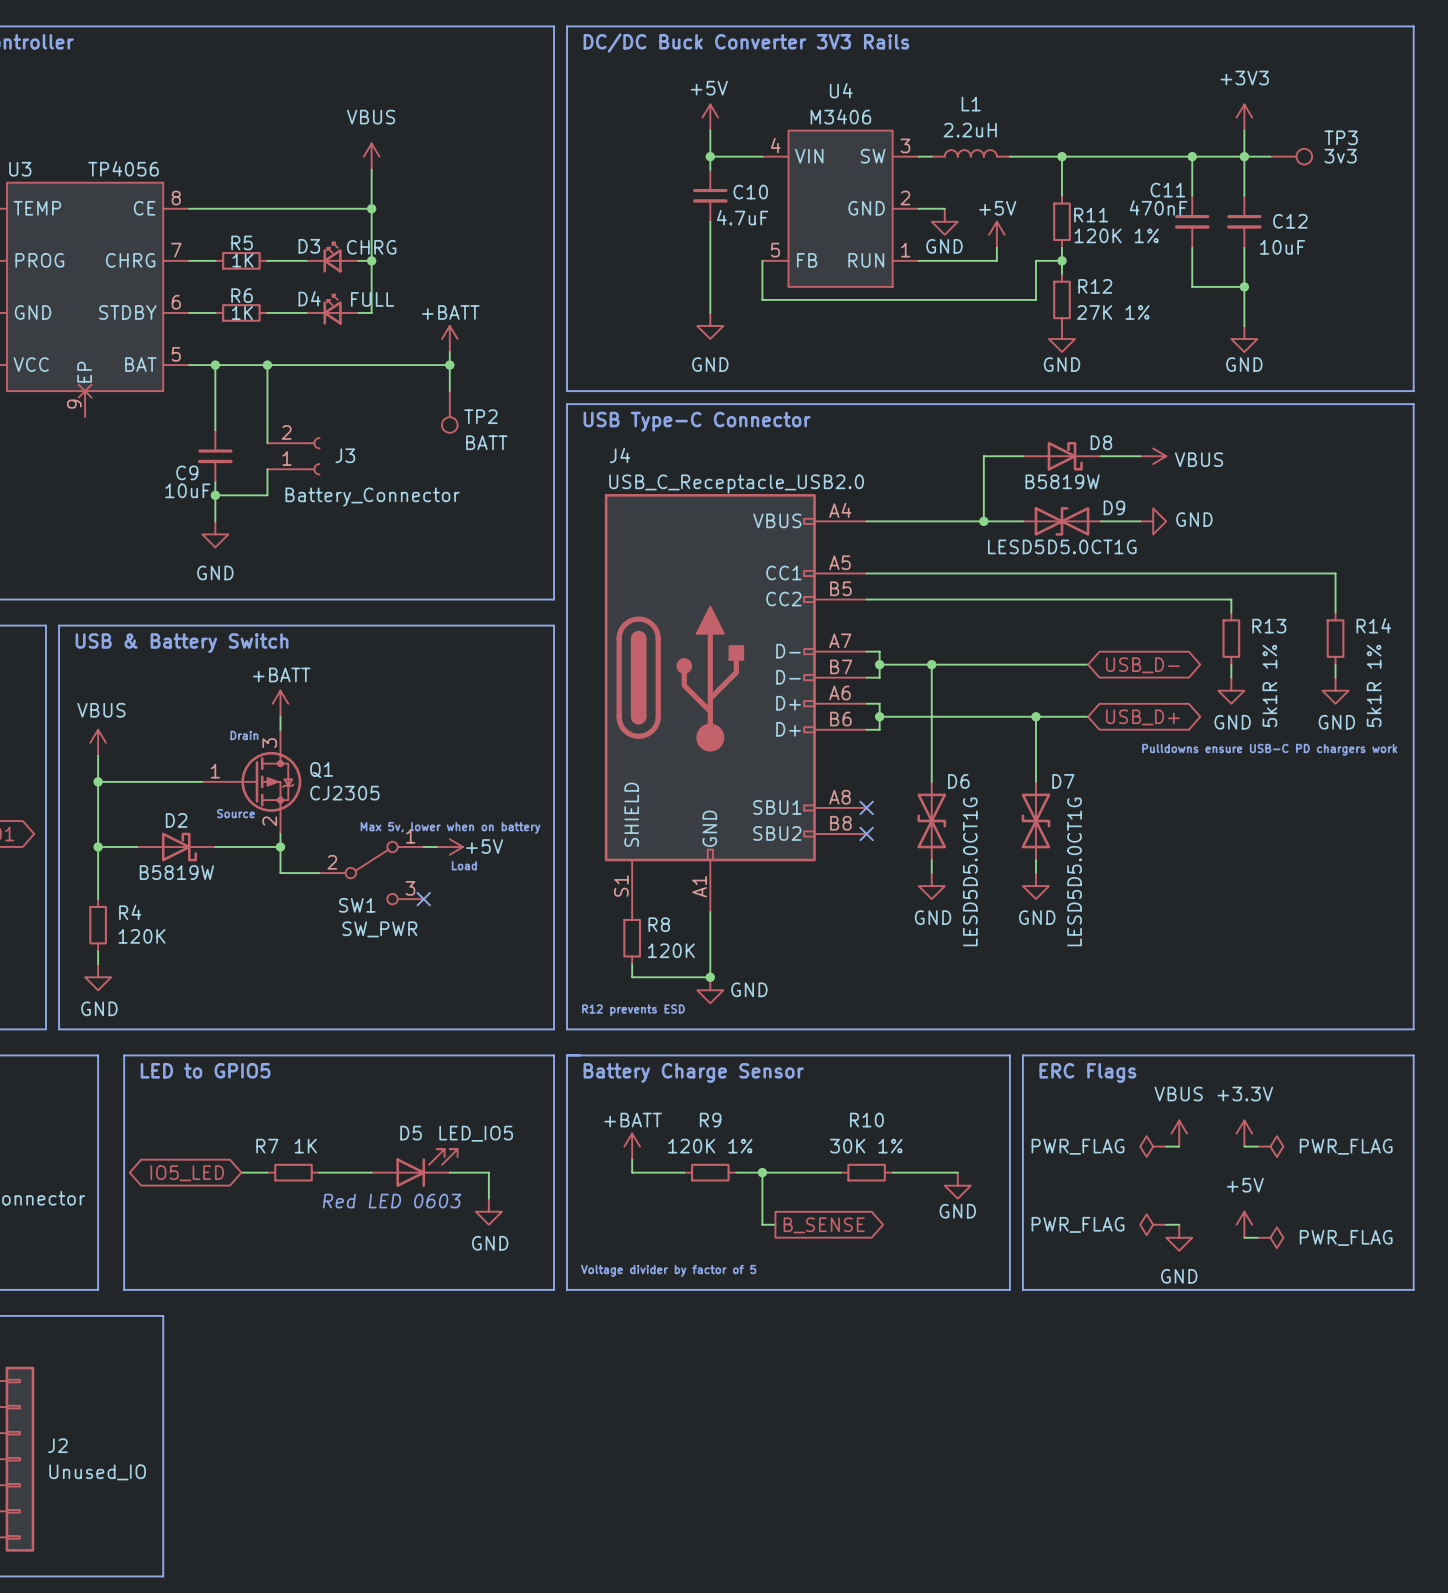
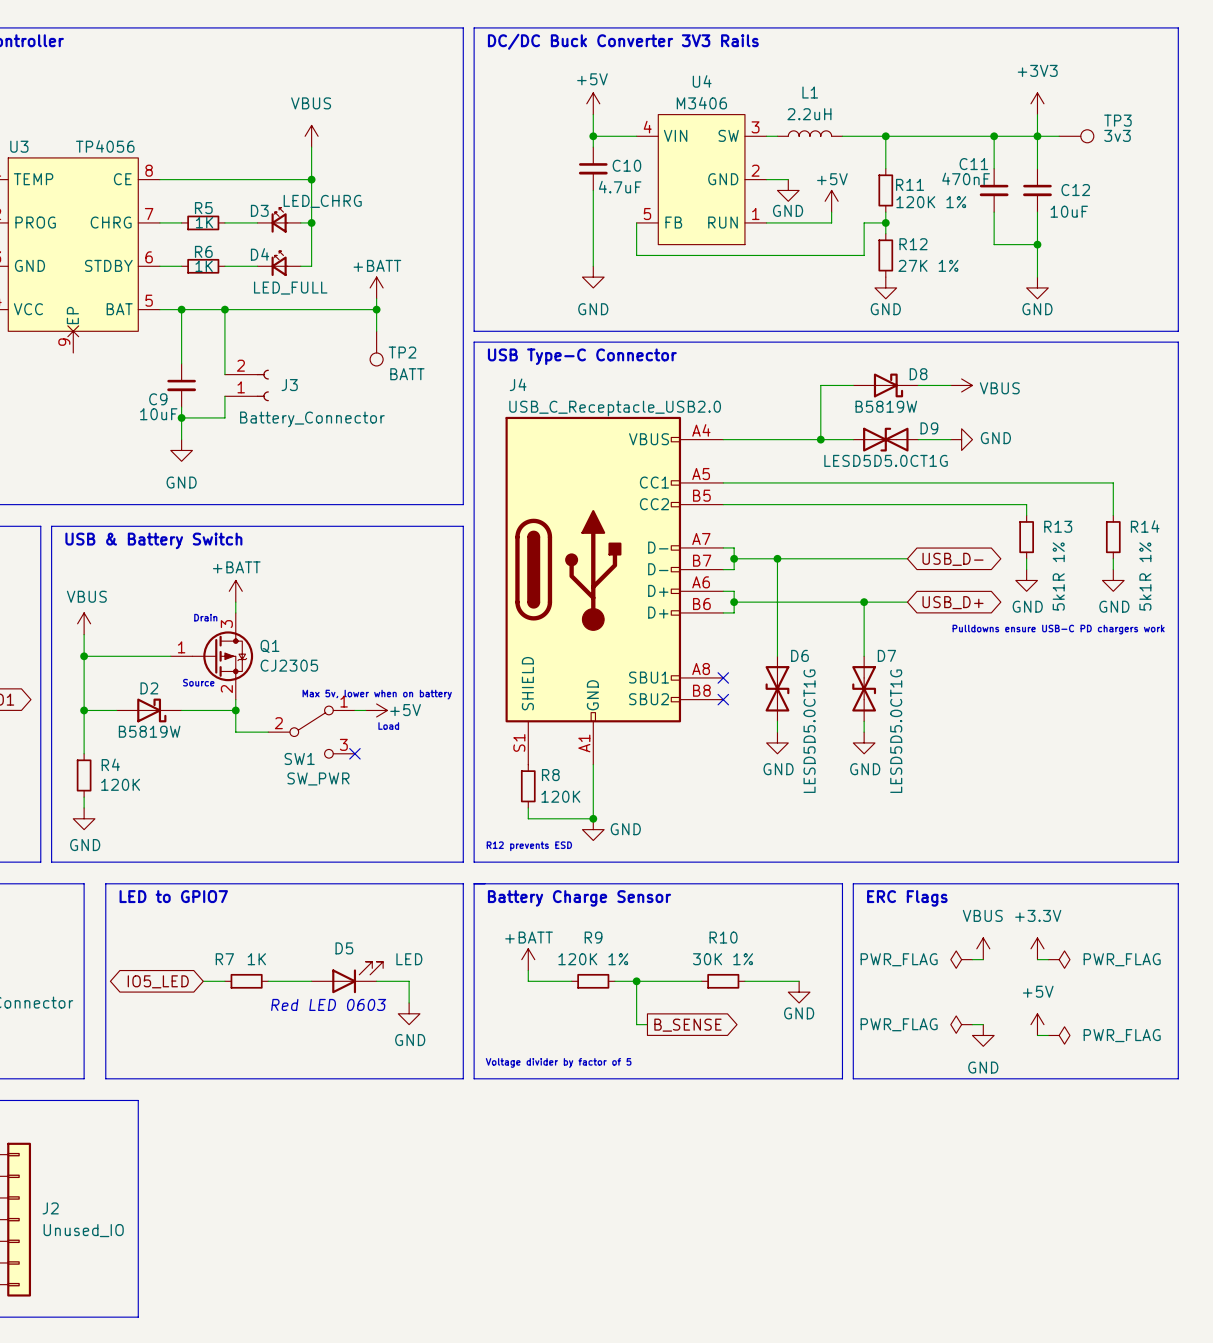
D3 value: CHRG (371, 247) -> LED_CHRG (322, 201)
D4 value: FULL (372, 299) -> LED_FULL (290, 288)
text: LED to GPIO5 (205, 1070) -> LED to GPIO7 (173, 896)
D5 value: LED_IO5 (476, 1133) -> LED (409, 959)

